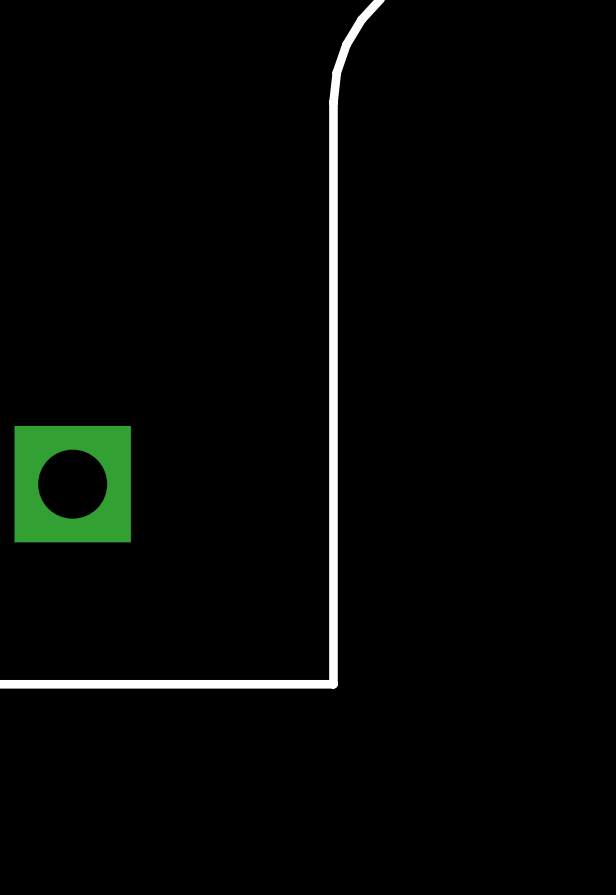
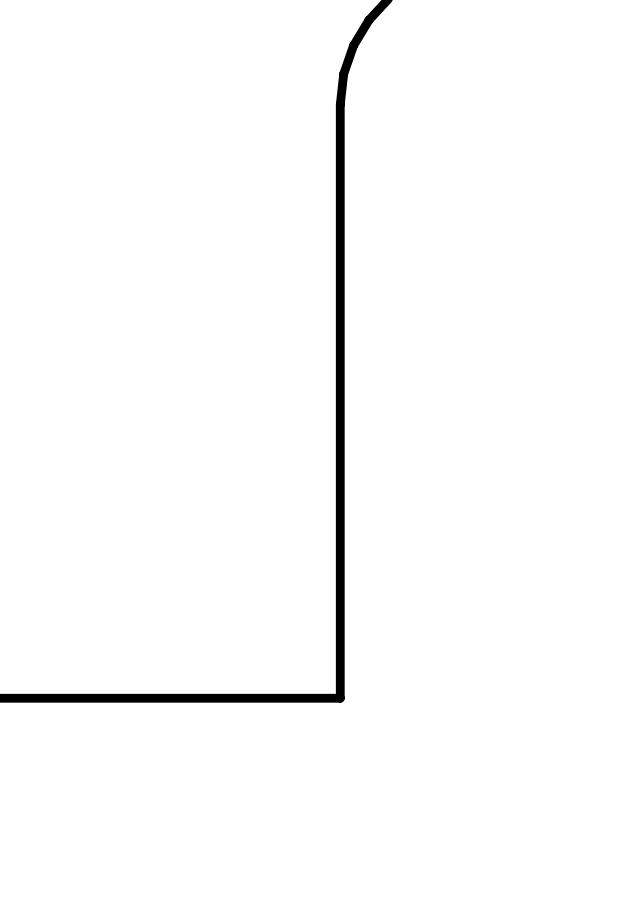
part: (72, 484) -> none

